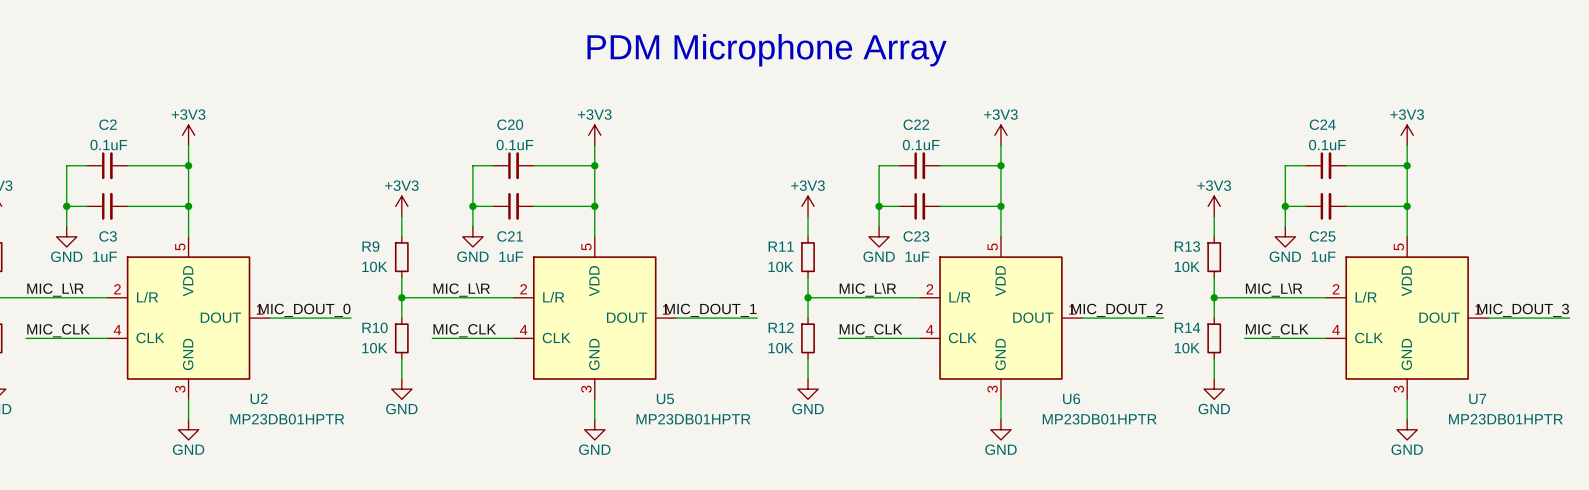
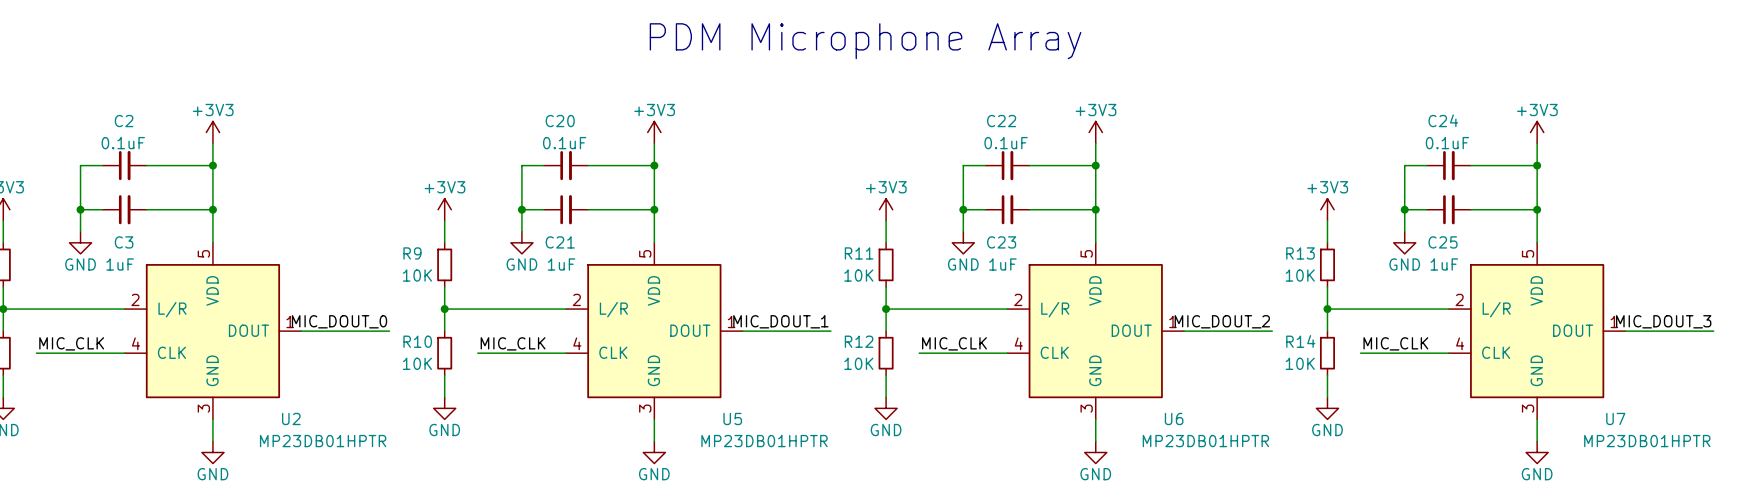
label: MIC_L\R (55, 289) -> none
label: MIC_L\R (461, 289) -> none
label: MIC_L\R (867, 289) -> none
label: MIC_L\R (1274, 289) -> none

